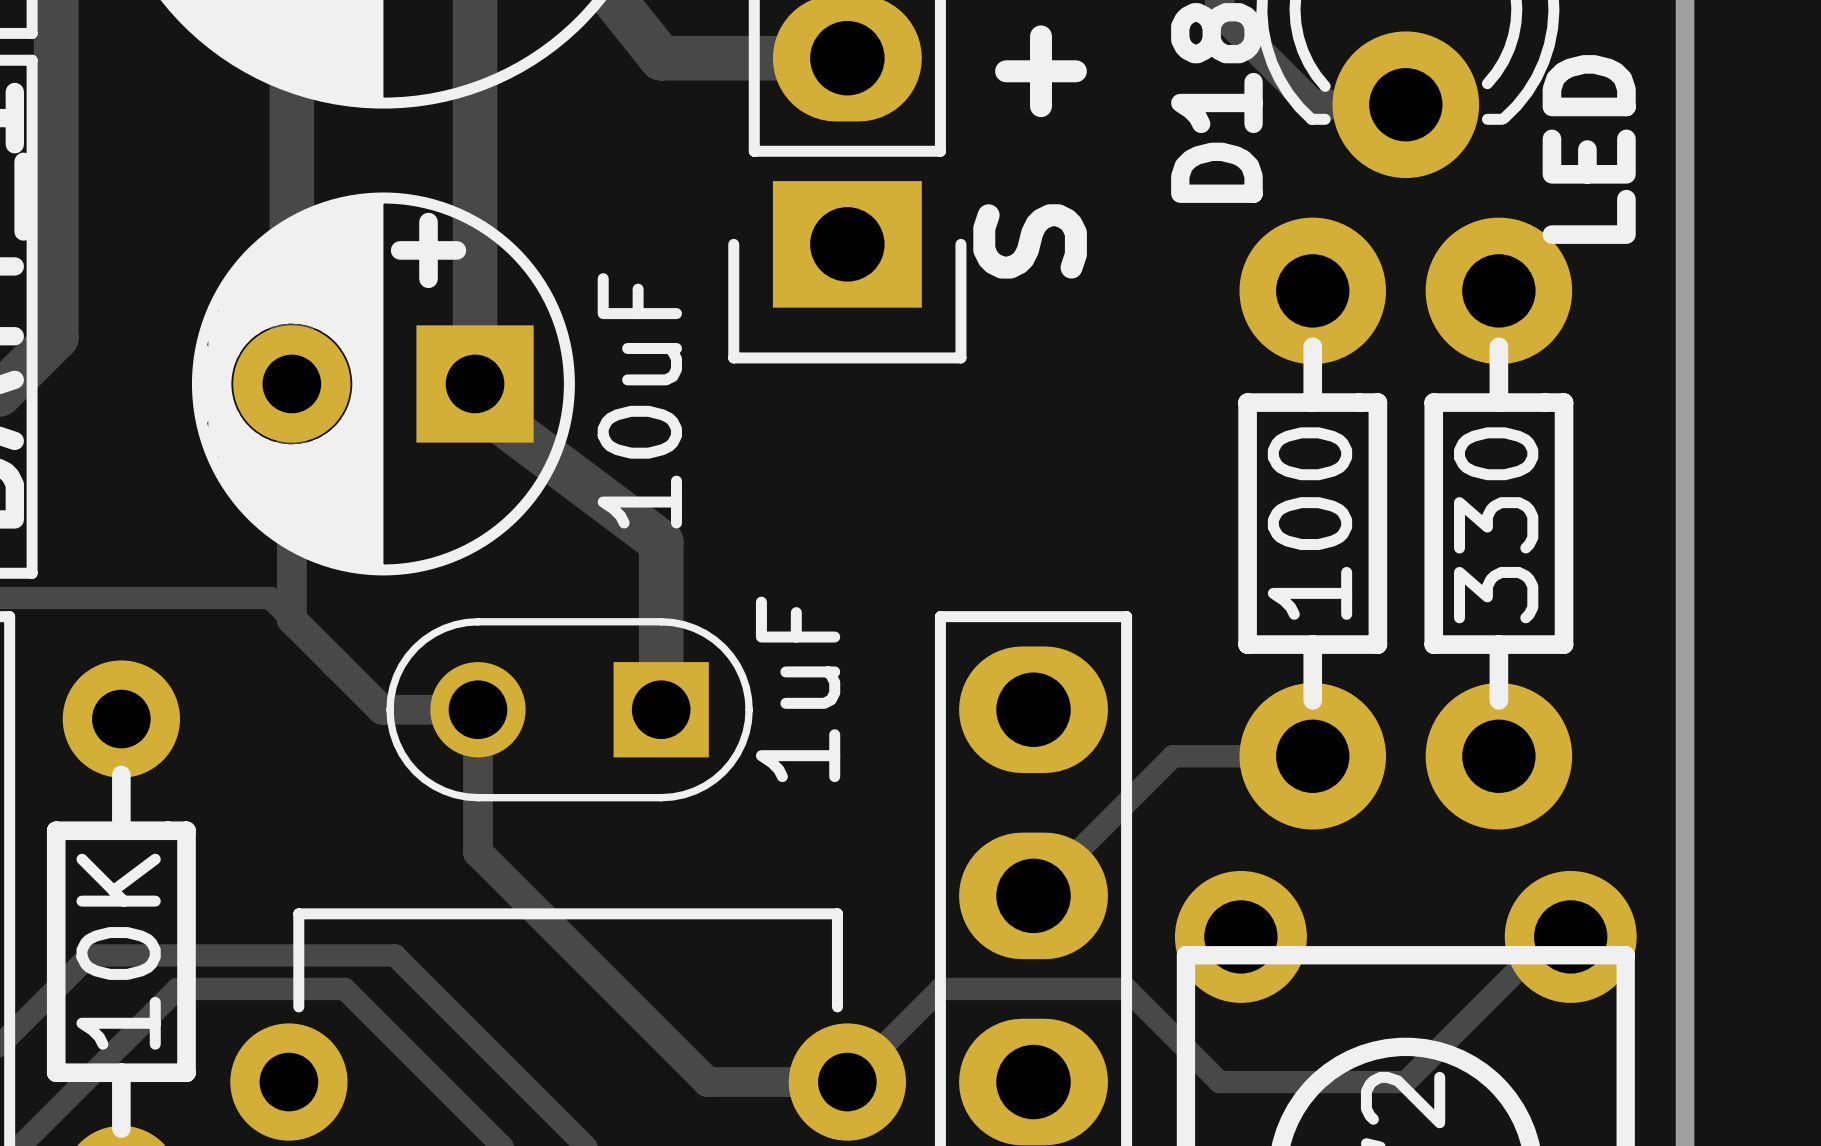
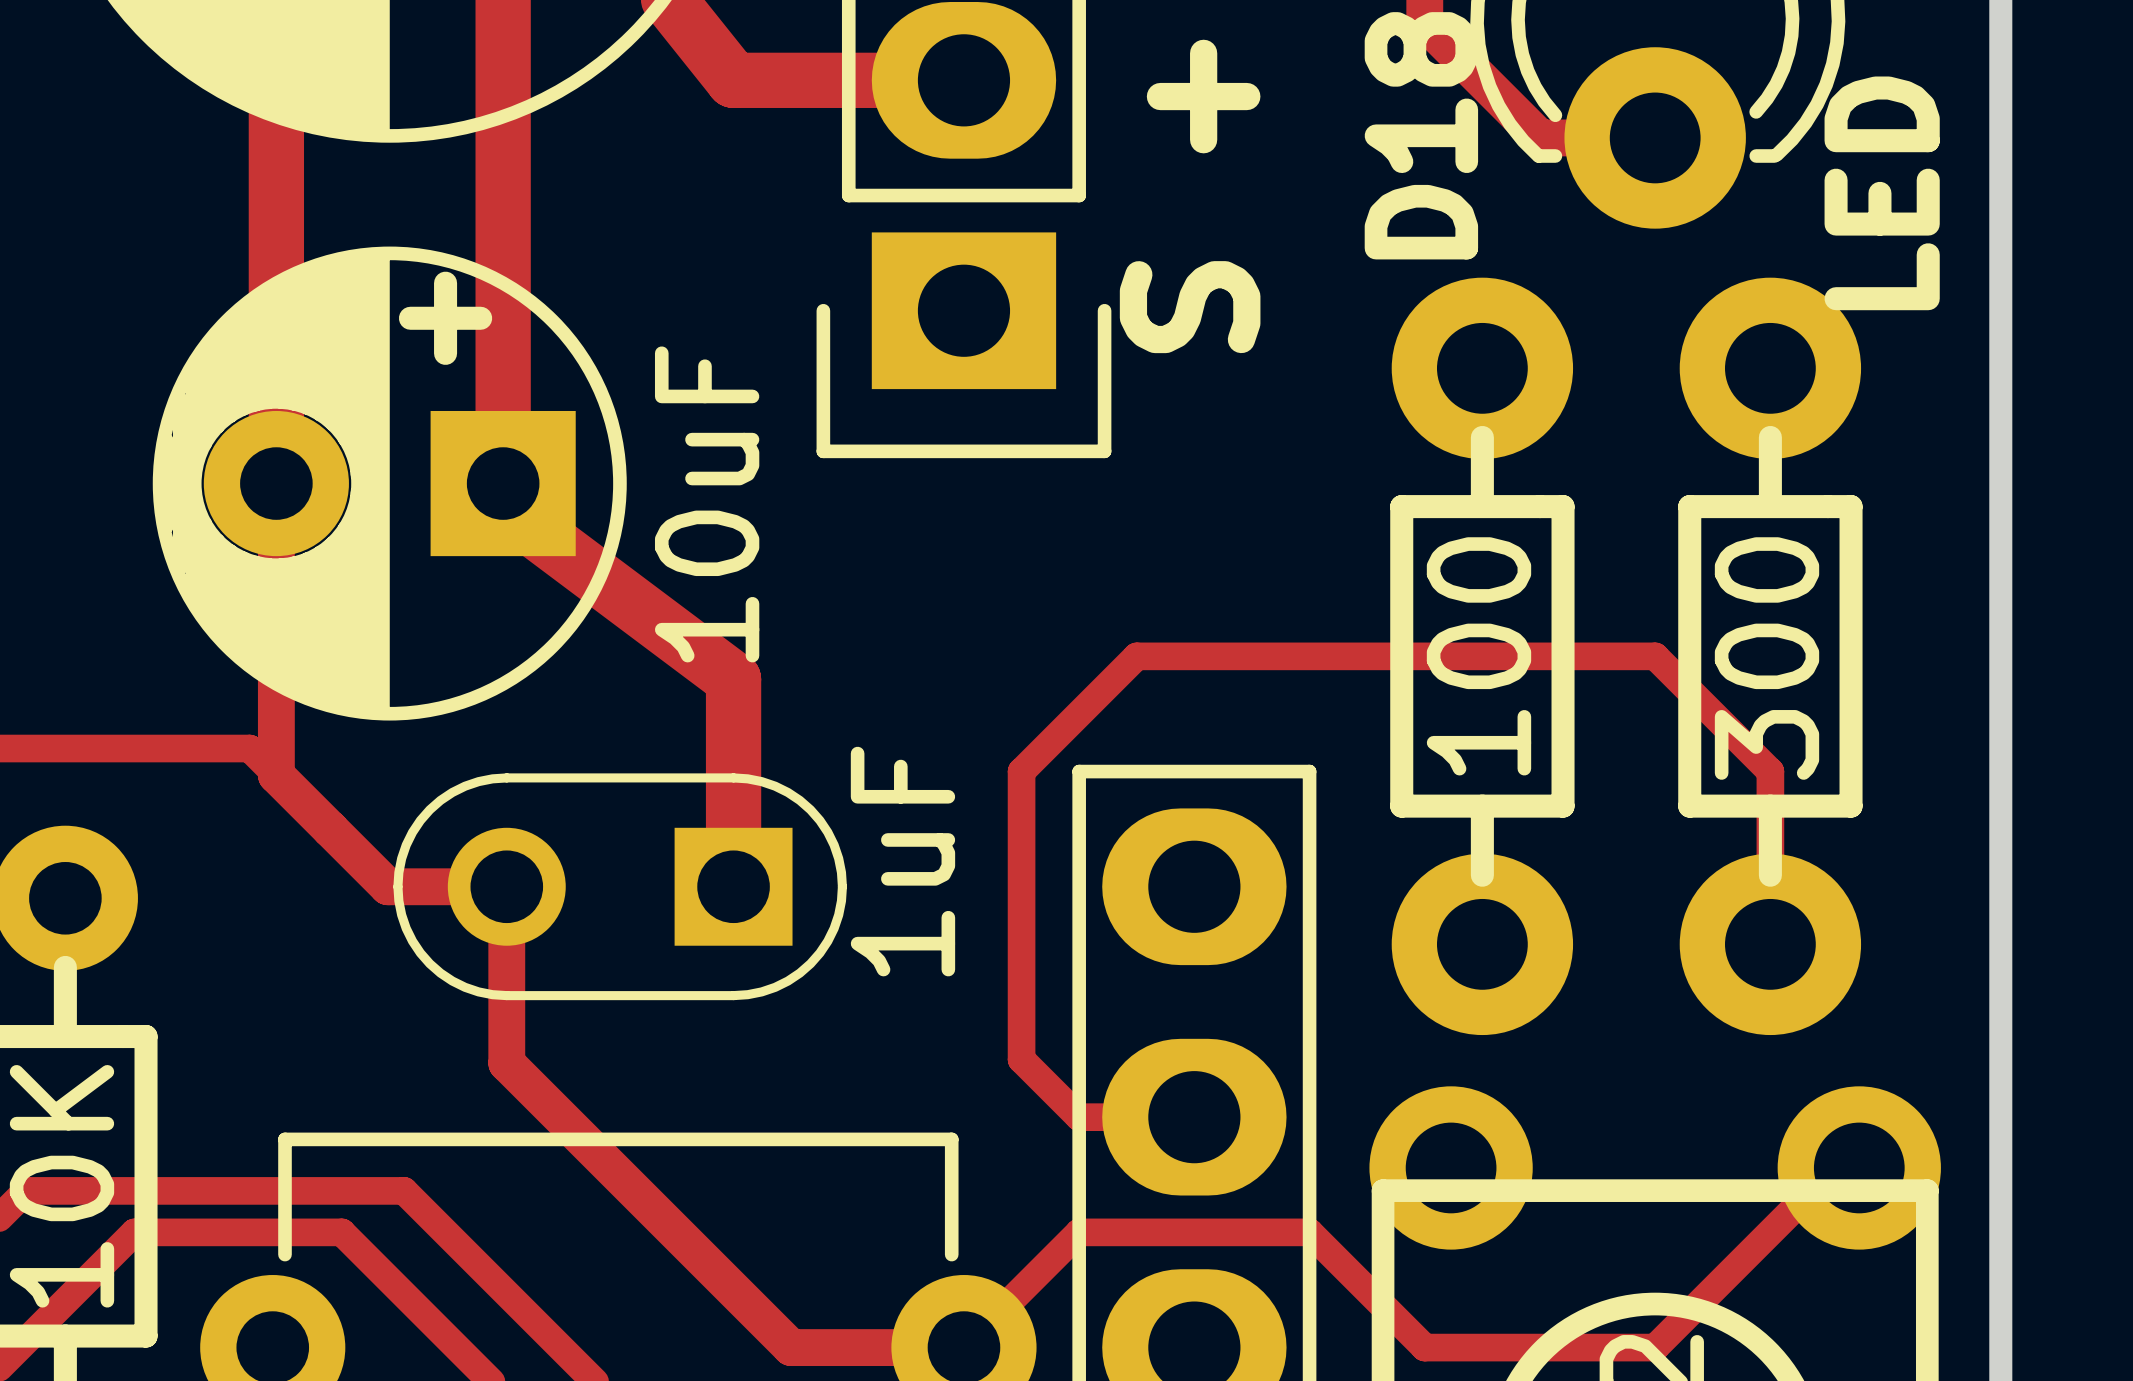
part position: (1312, 523) -> (1482, 656)
part value: 330 (1496, 525) -> 300 (1767, 658)
track: (1312, 756) (1173, 756) (1033, 895) -> (1770, 944) (1770, 771) (1655, 656) (1136, 656) (1021, 771) (1021, 1059) (1079, 1117) (1194, 1117)

